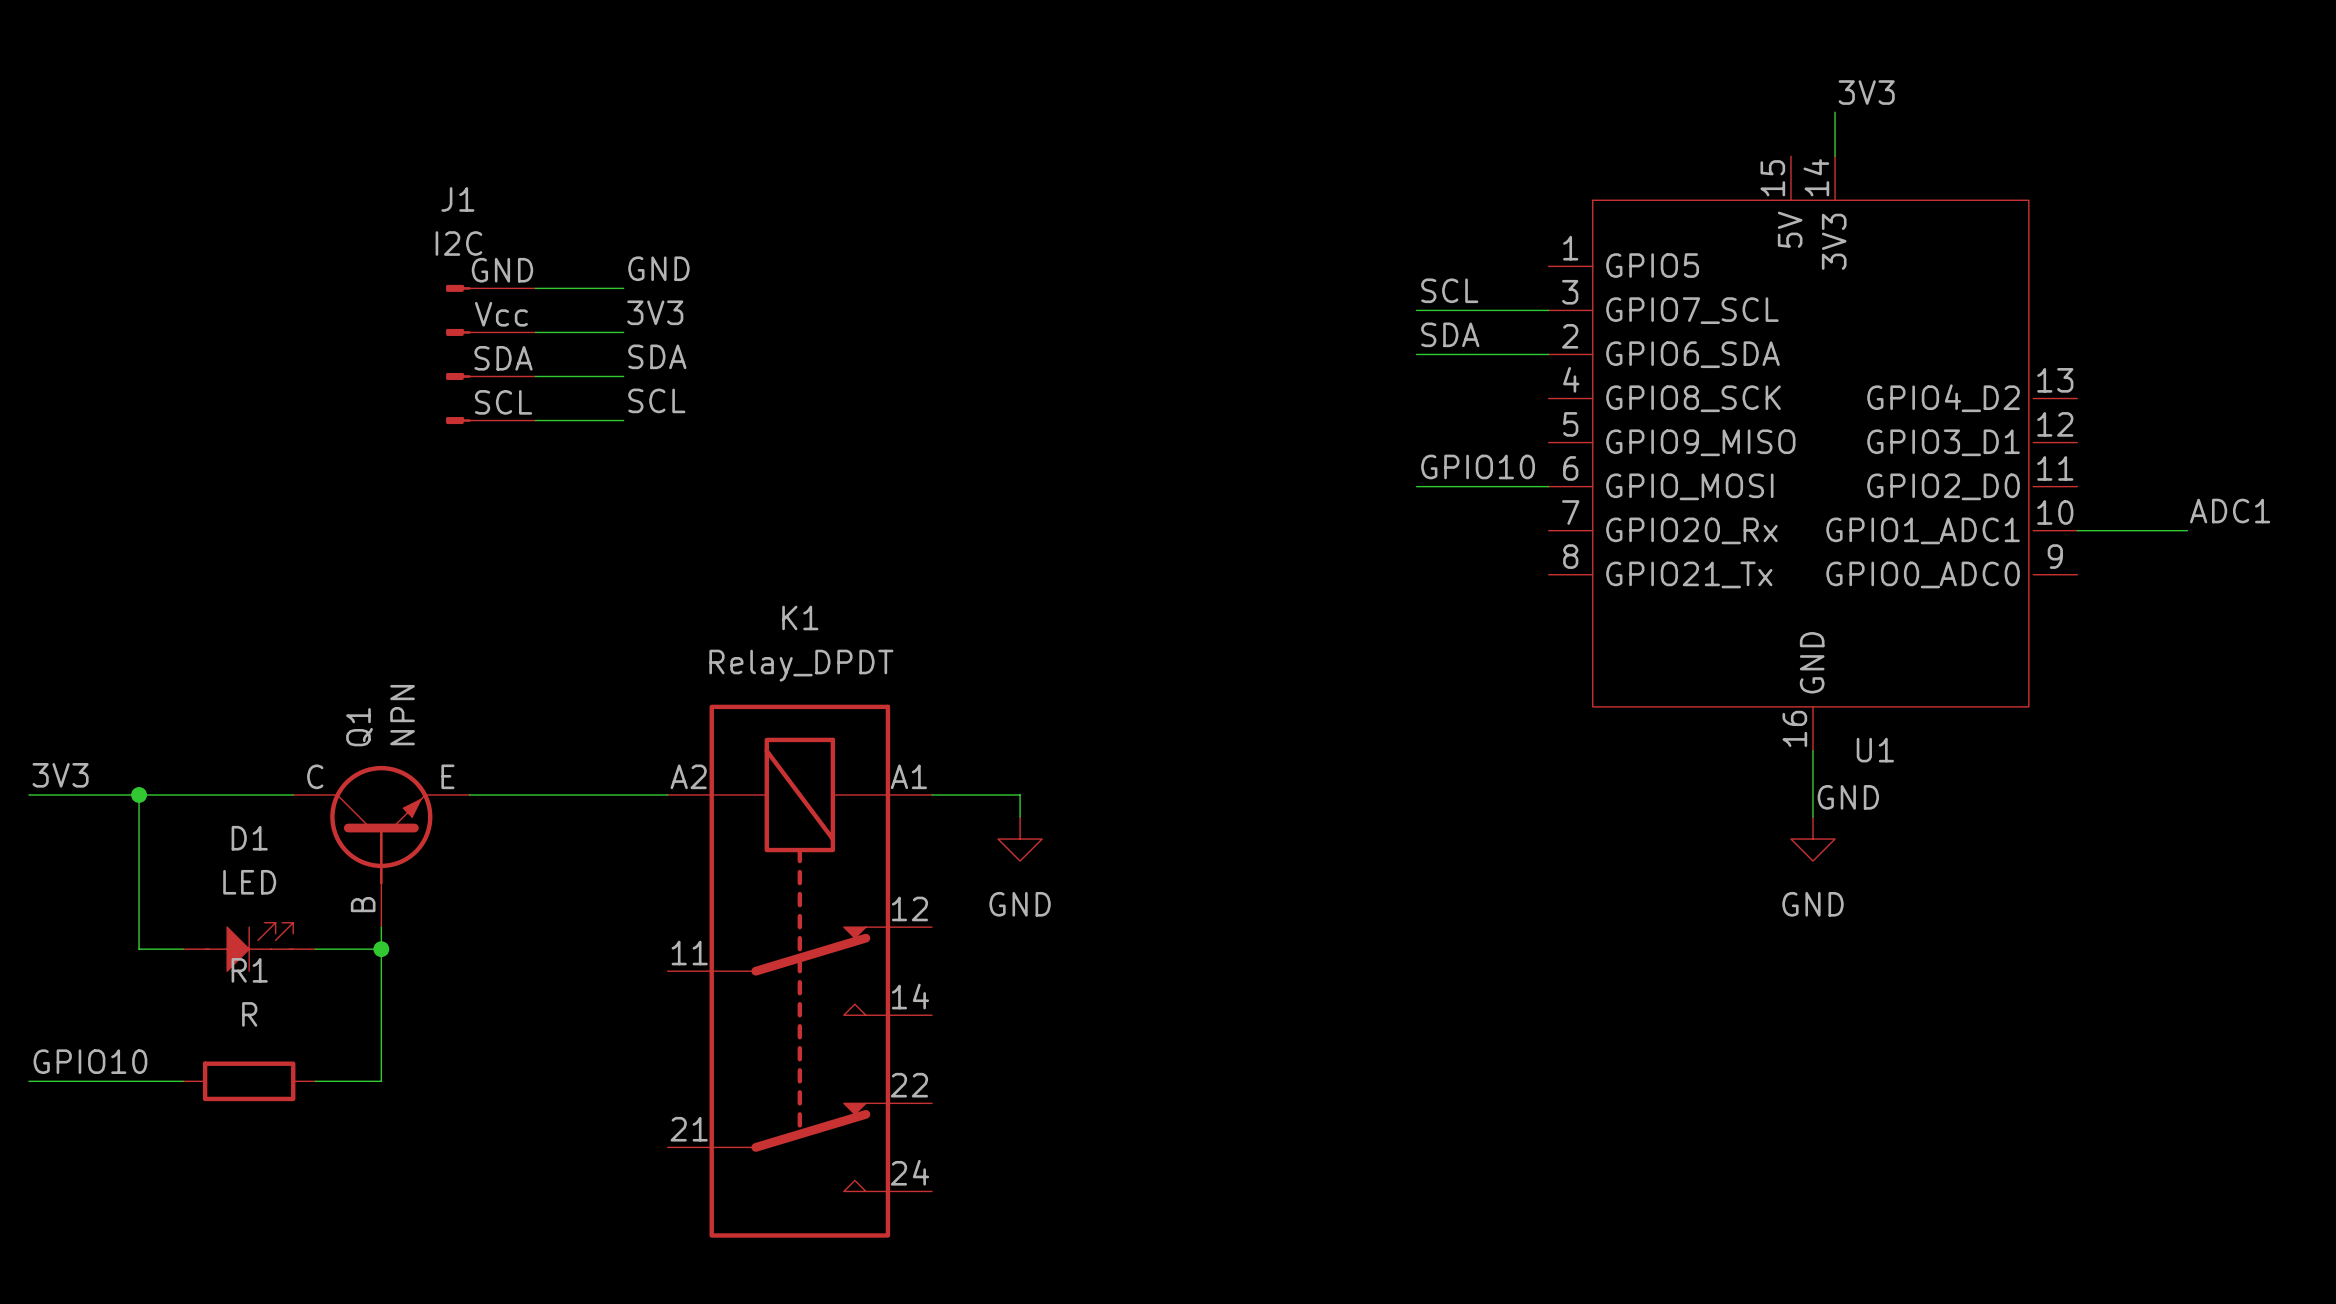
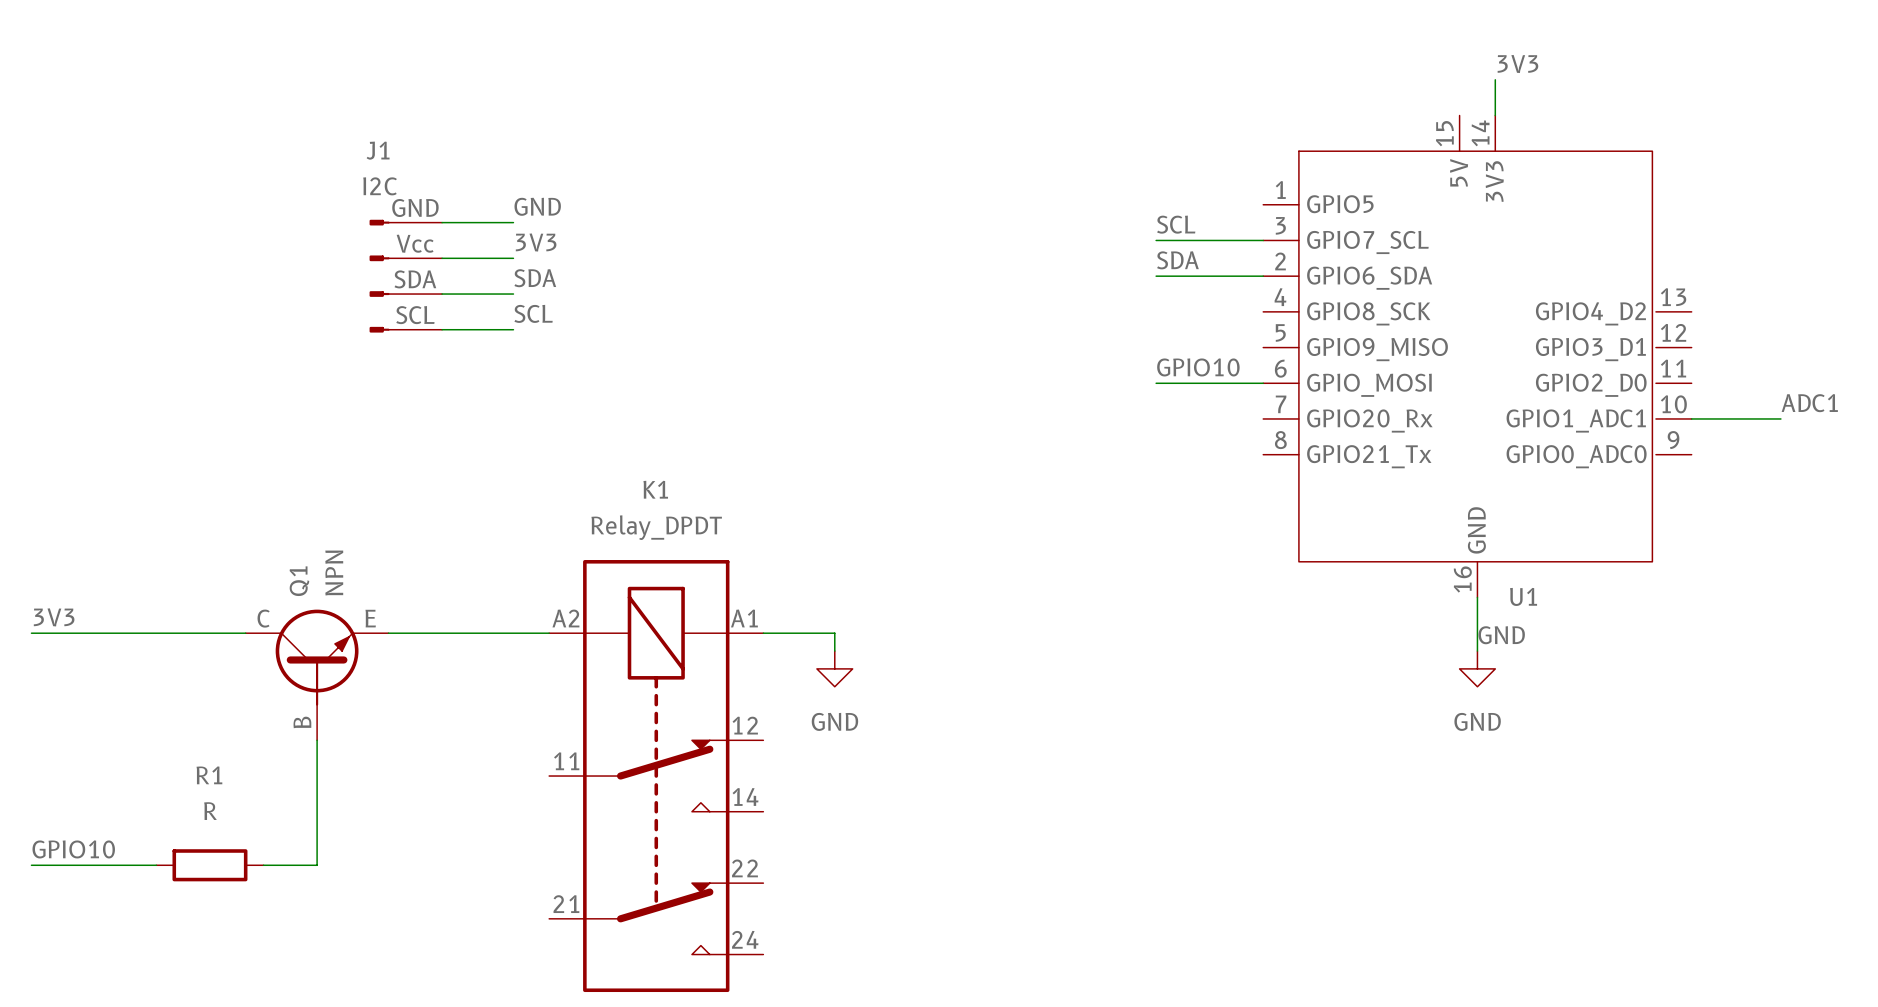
wire: (139, 794) (139, 949) (183, 949) -> none
junction: (139, 794) -> none
D1: LED (249, 946) -> none
wire: (315, 949) (381, 949) -> none
junction: (381, 949) -> none

